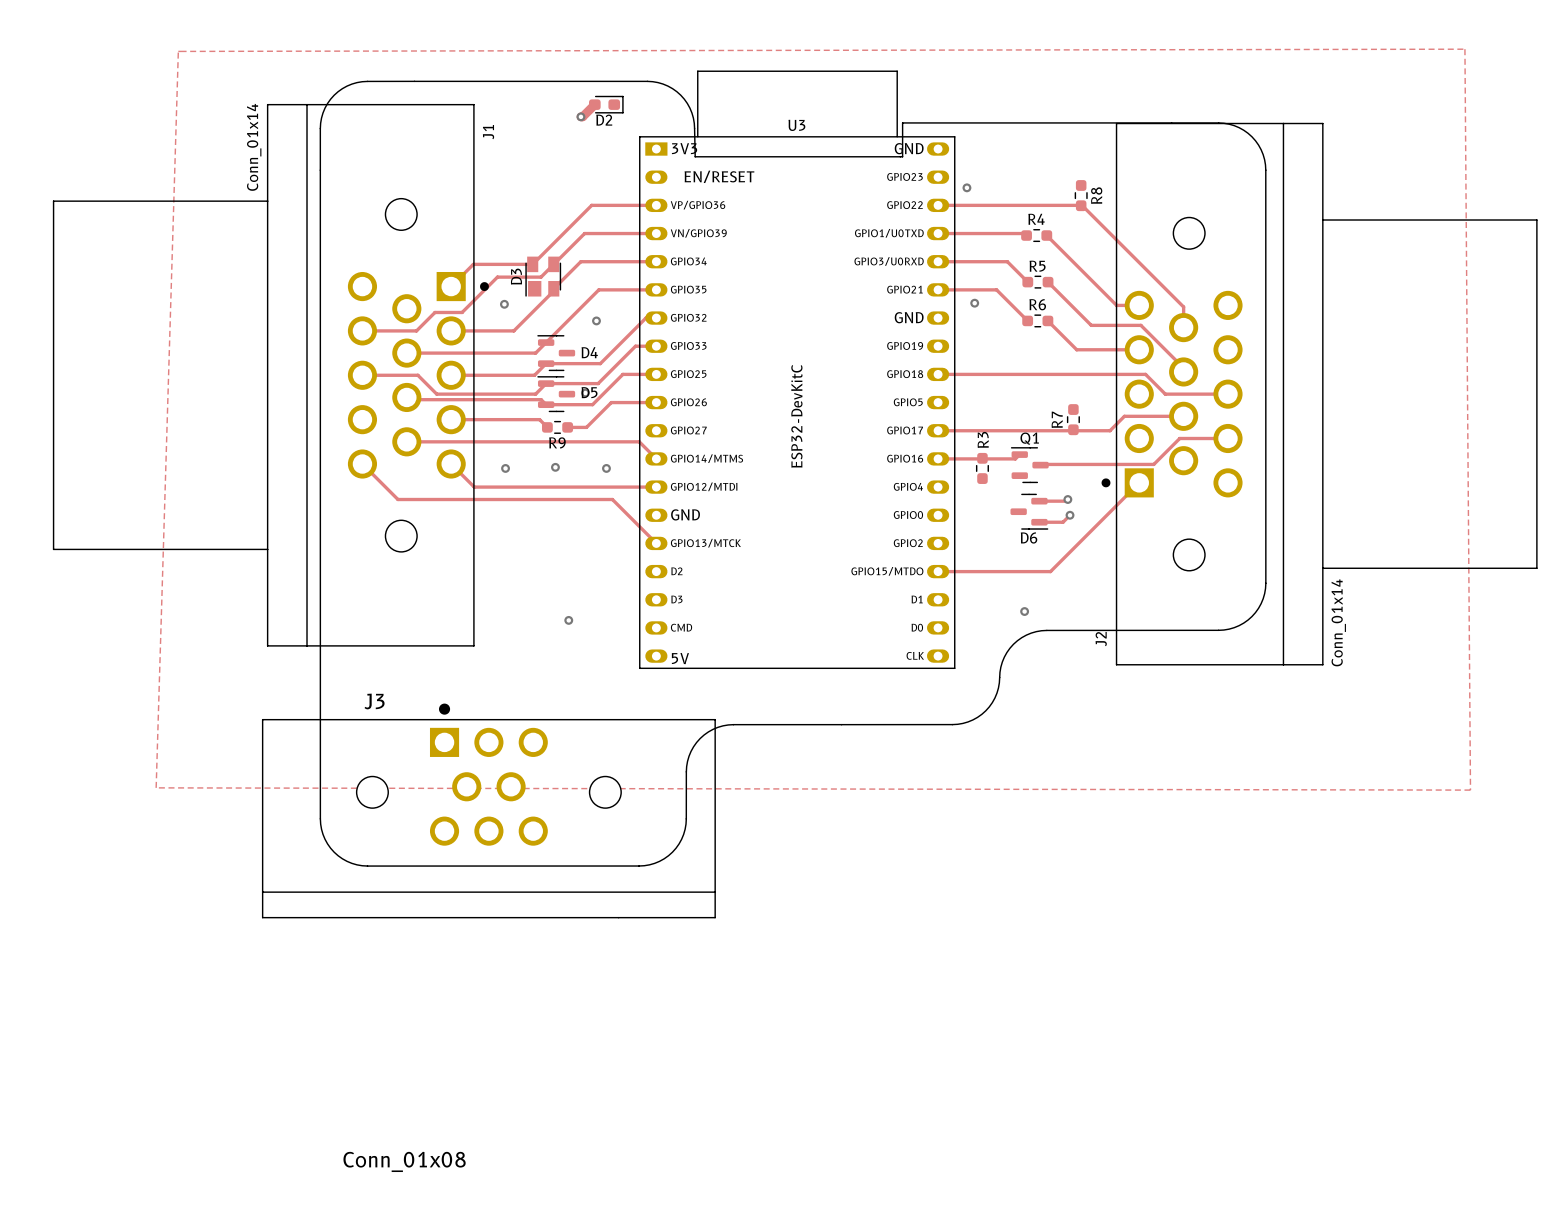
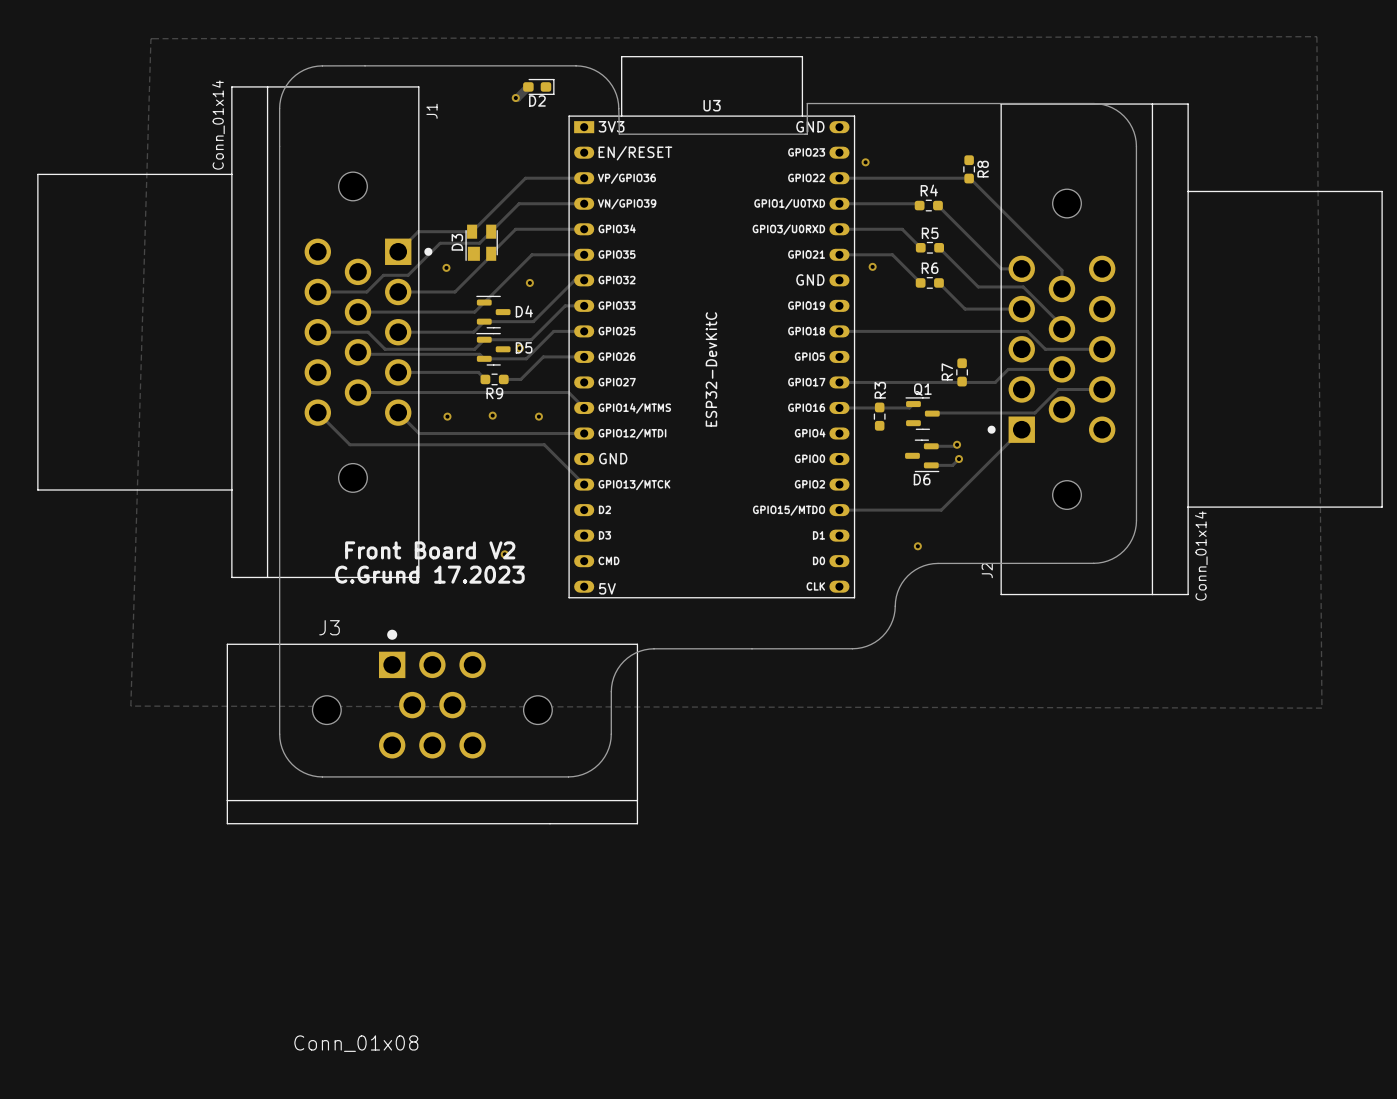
text: none -> Front Board V2 (430, 550)
text: none -> C.Grund 17.2023 (429, 574)

